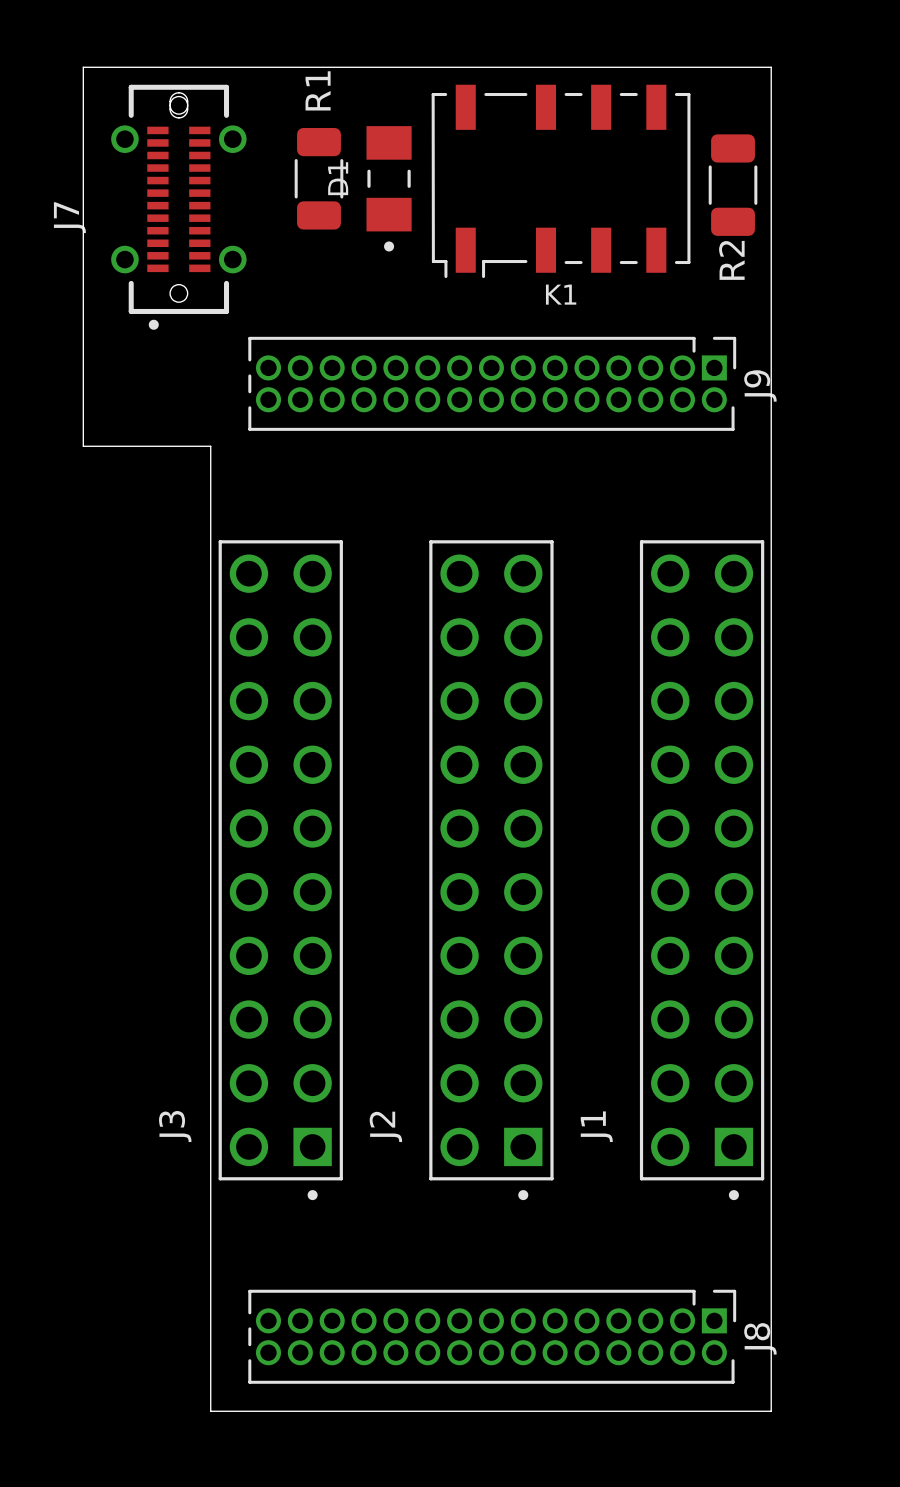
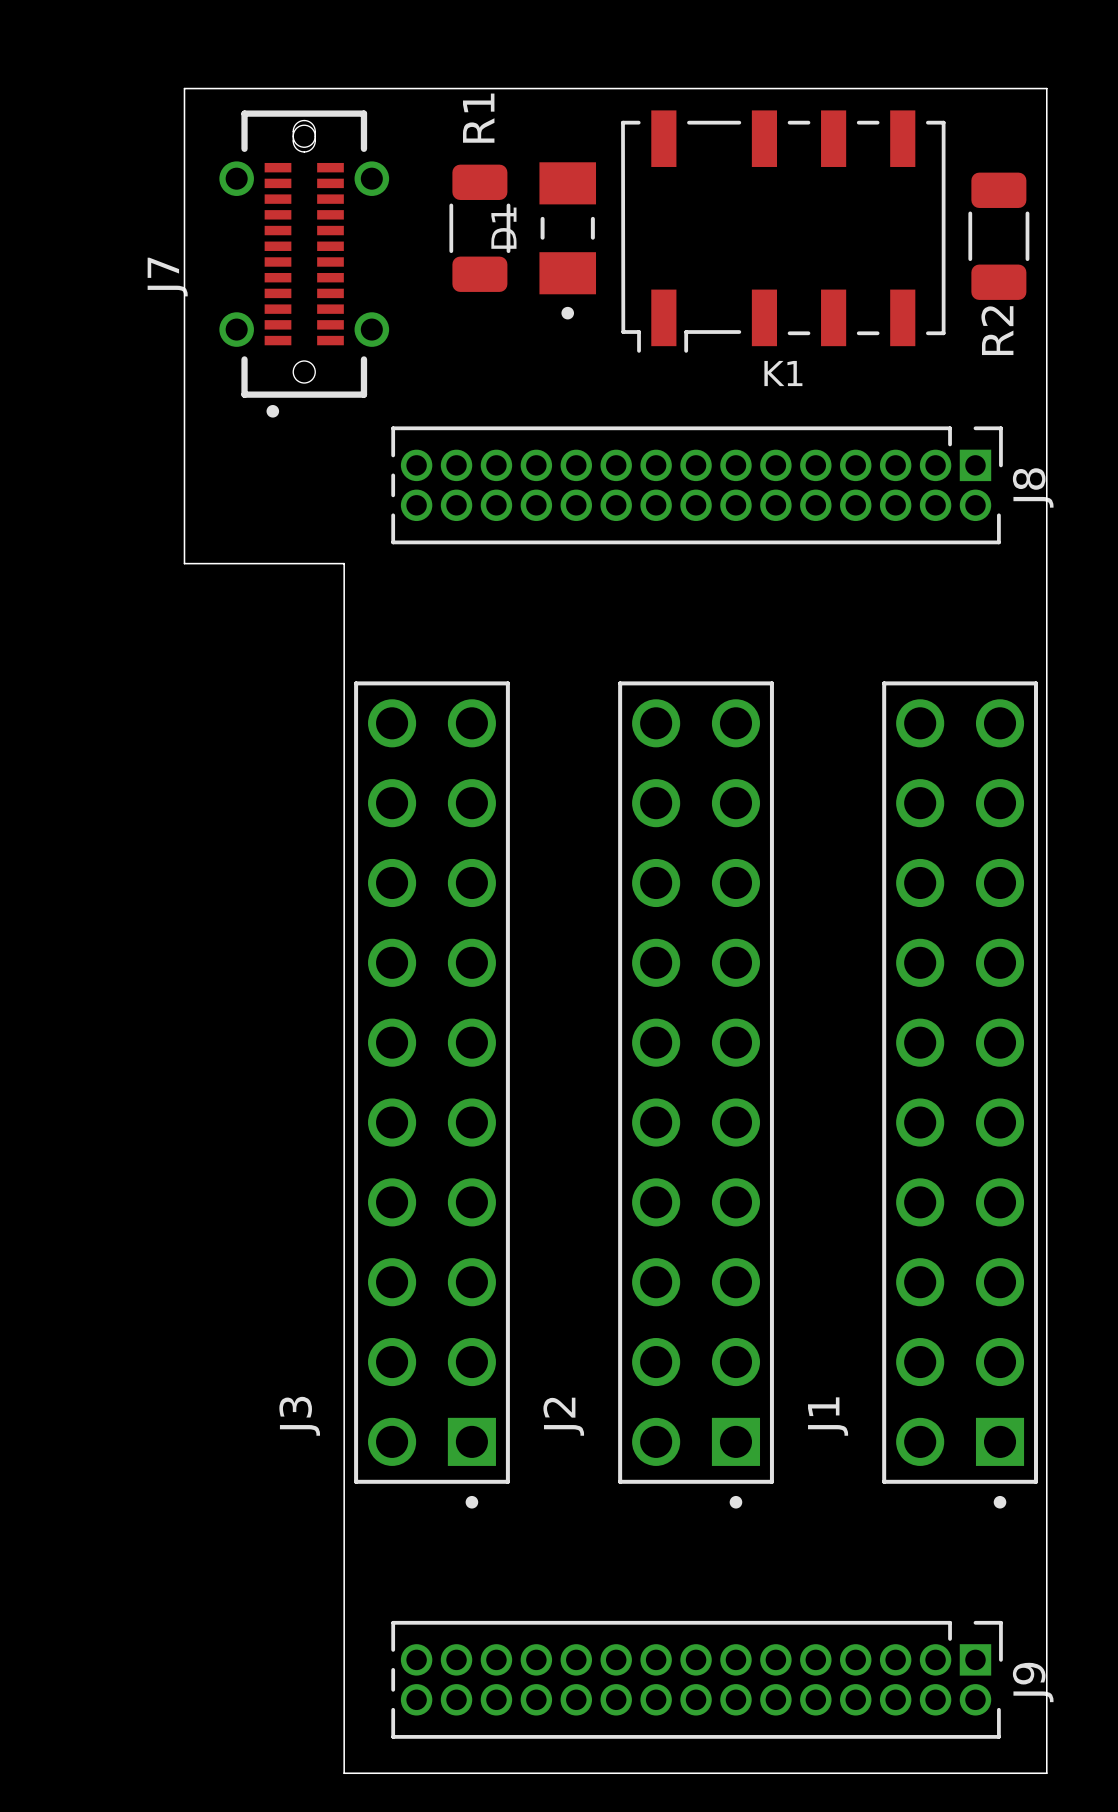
J9 name: J9 (760, 385) -> J8 (1033, 487)
J8 name: J8 (760, 1338) -> J9 (1033, 1682)

